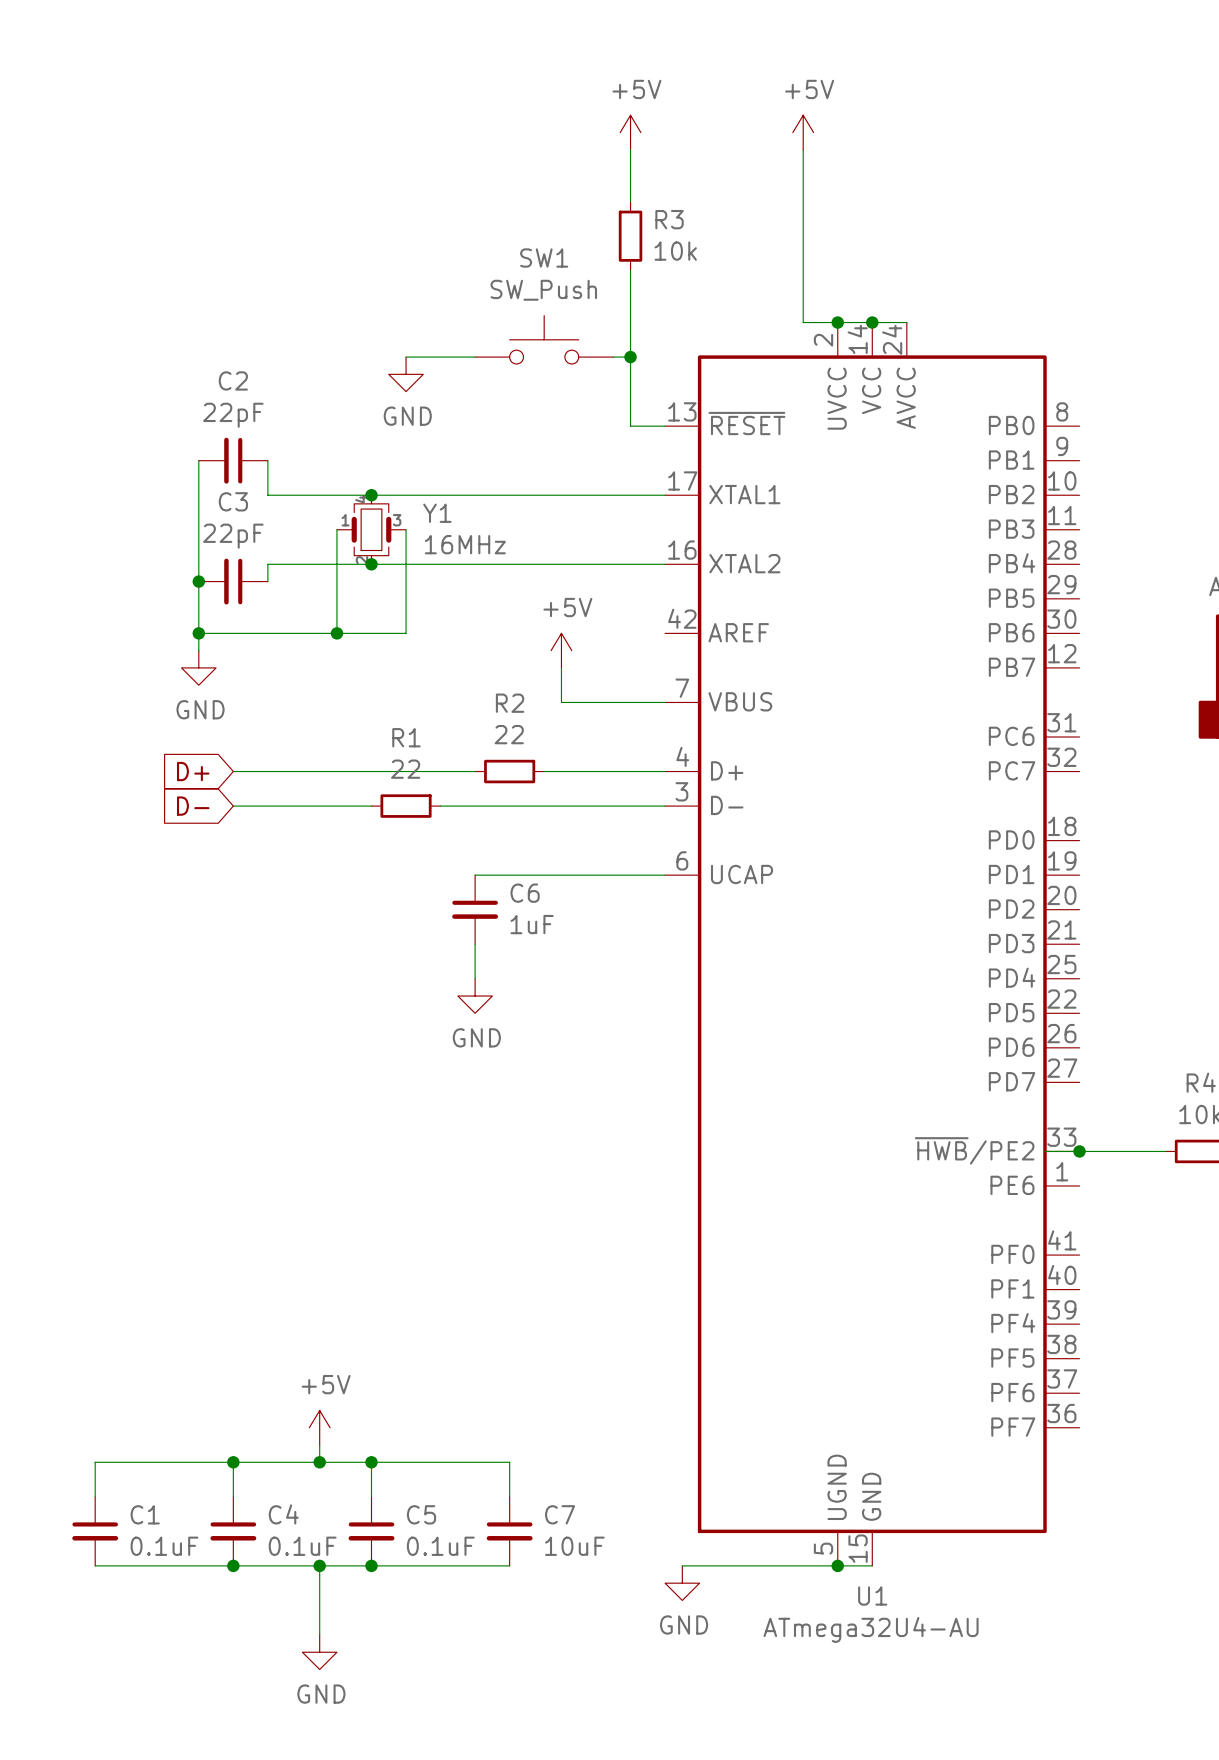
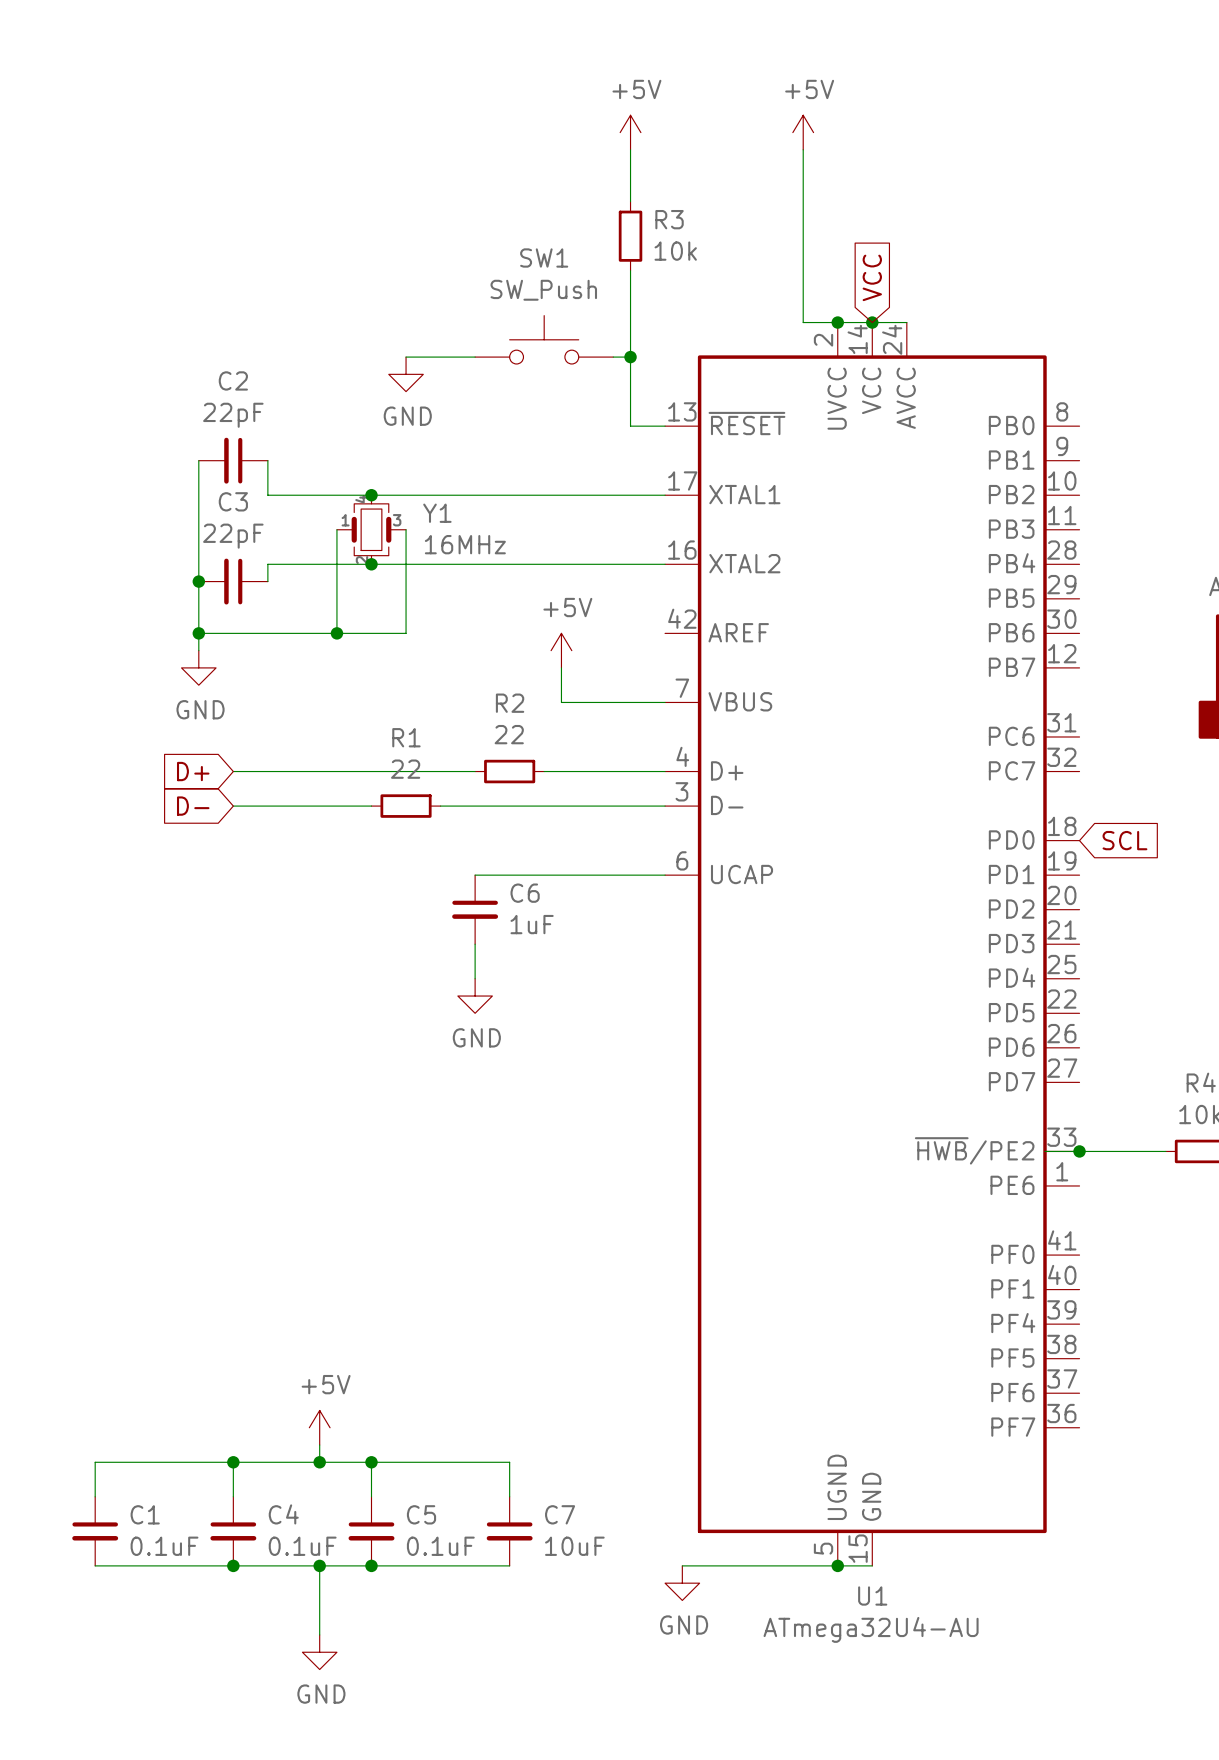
global label: none -> VCC (872, 277)
global label: none -> SCL (1124, 840)

